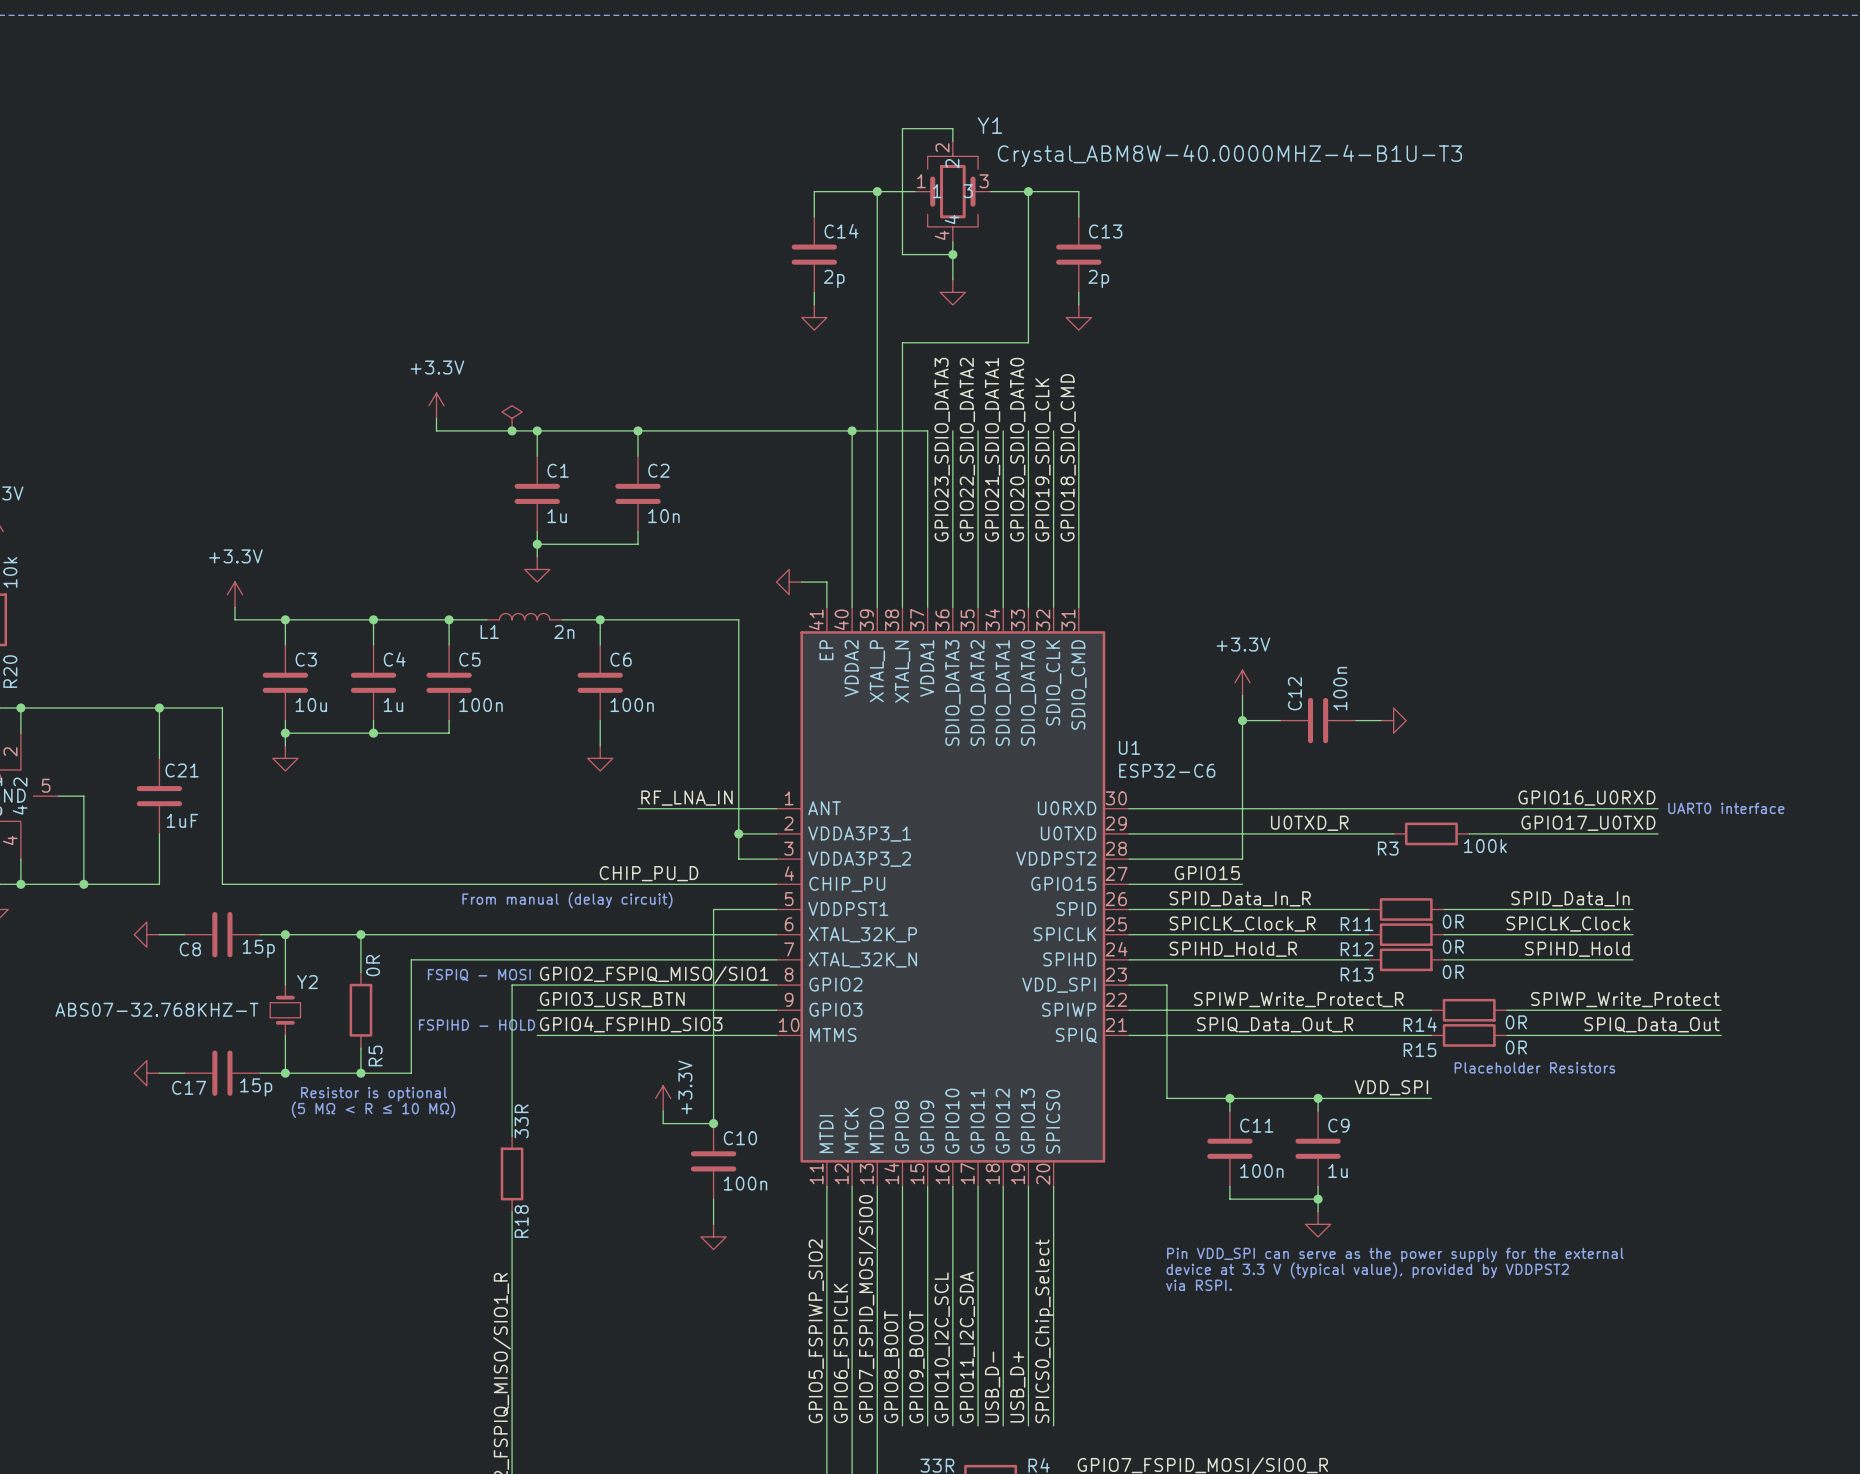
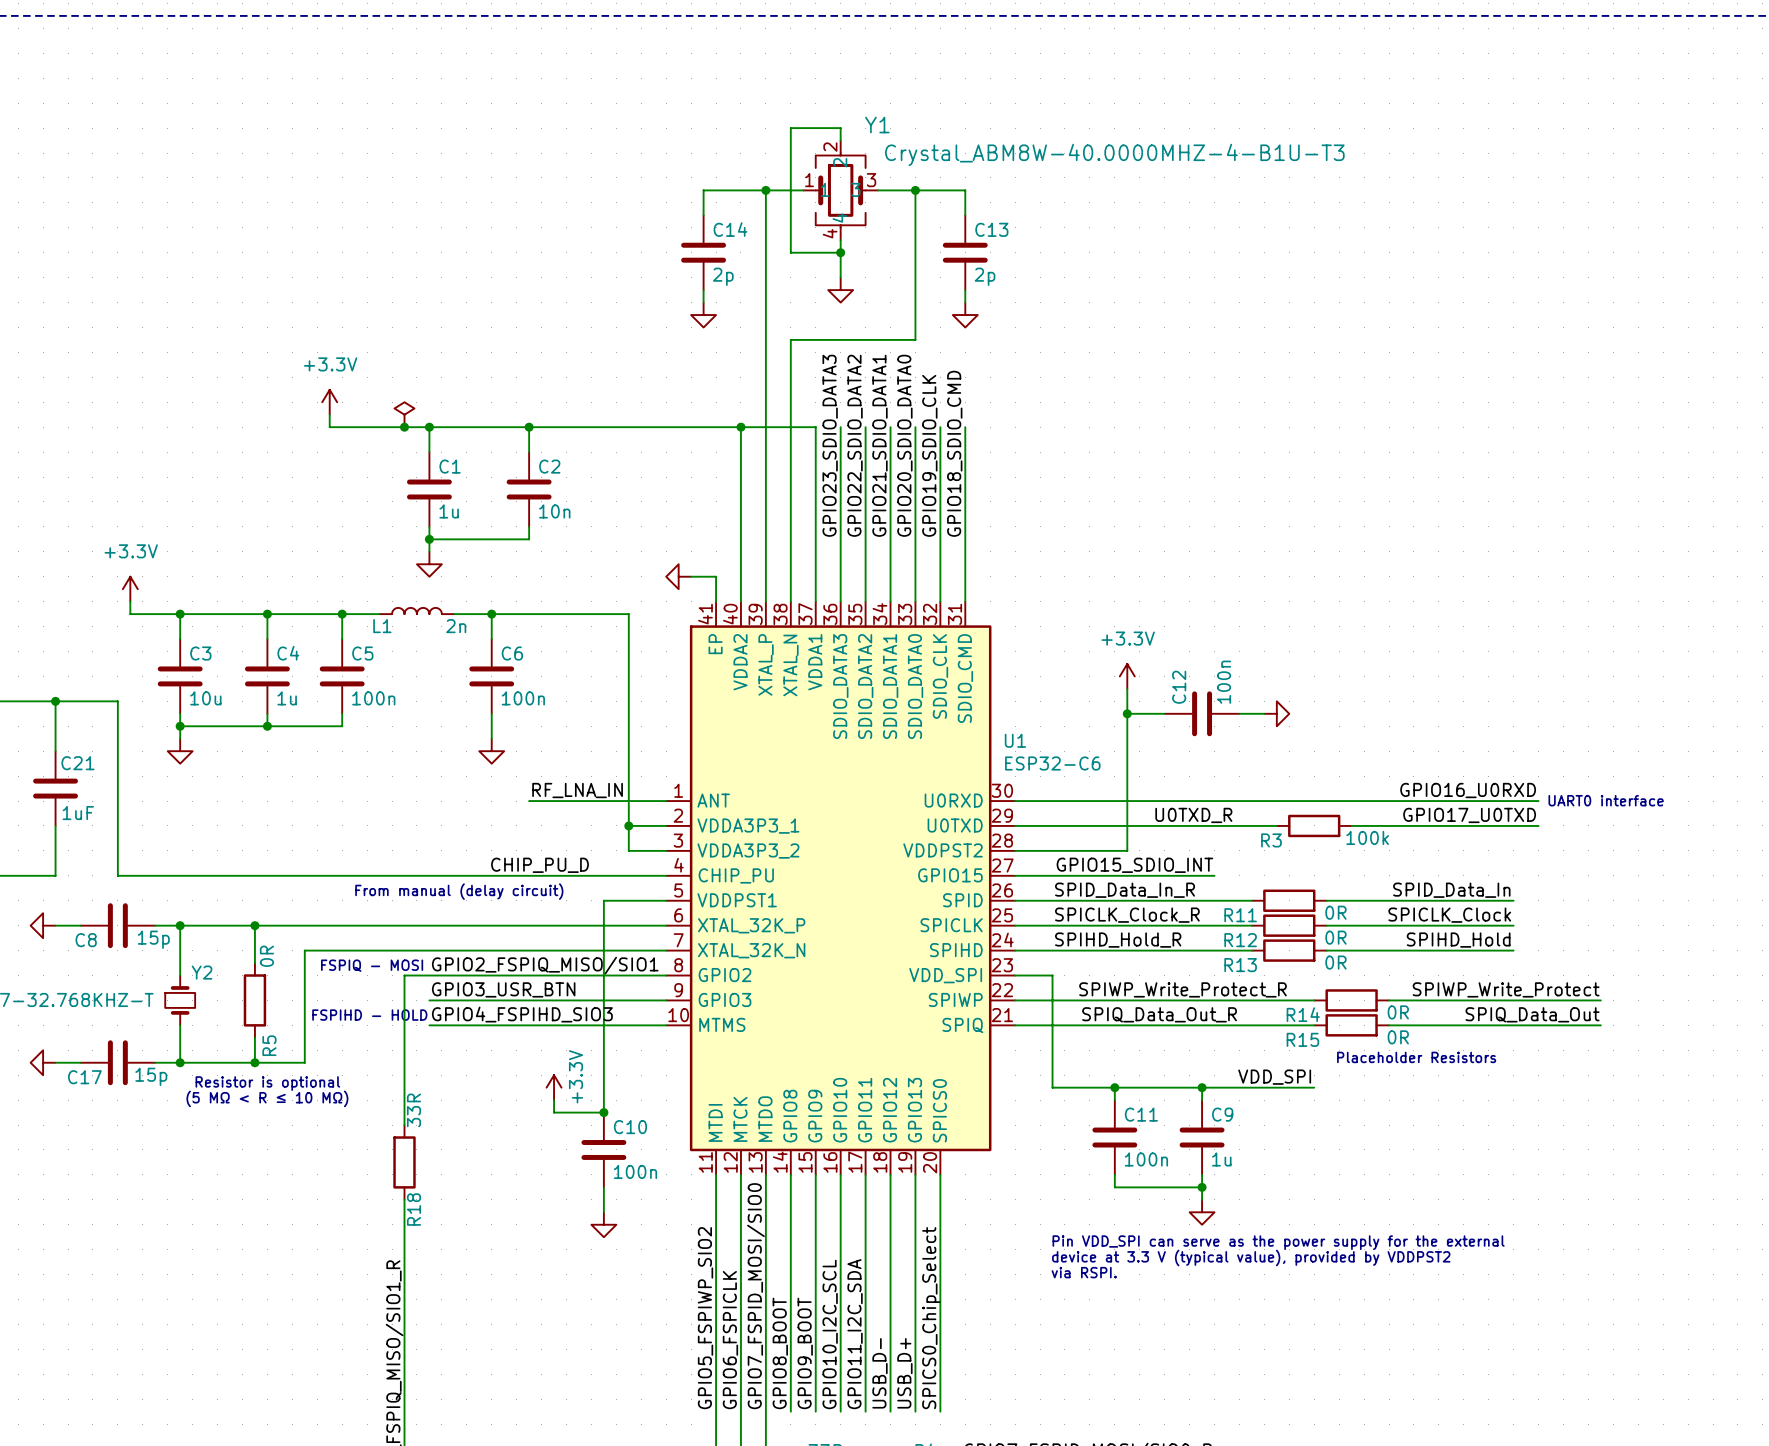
label: GPIO15 (1207, 873) -> none
label: none -> GPIO15_SDIO_INT (1134, 865)
wire: none -> (1127, 875) (1214, 875)

